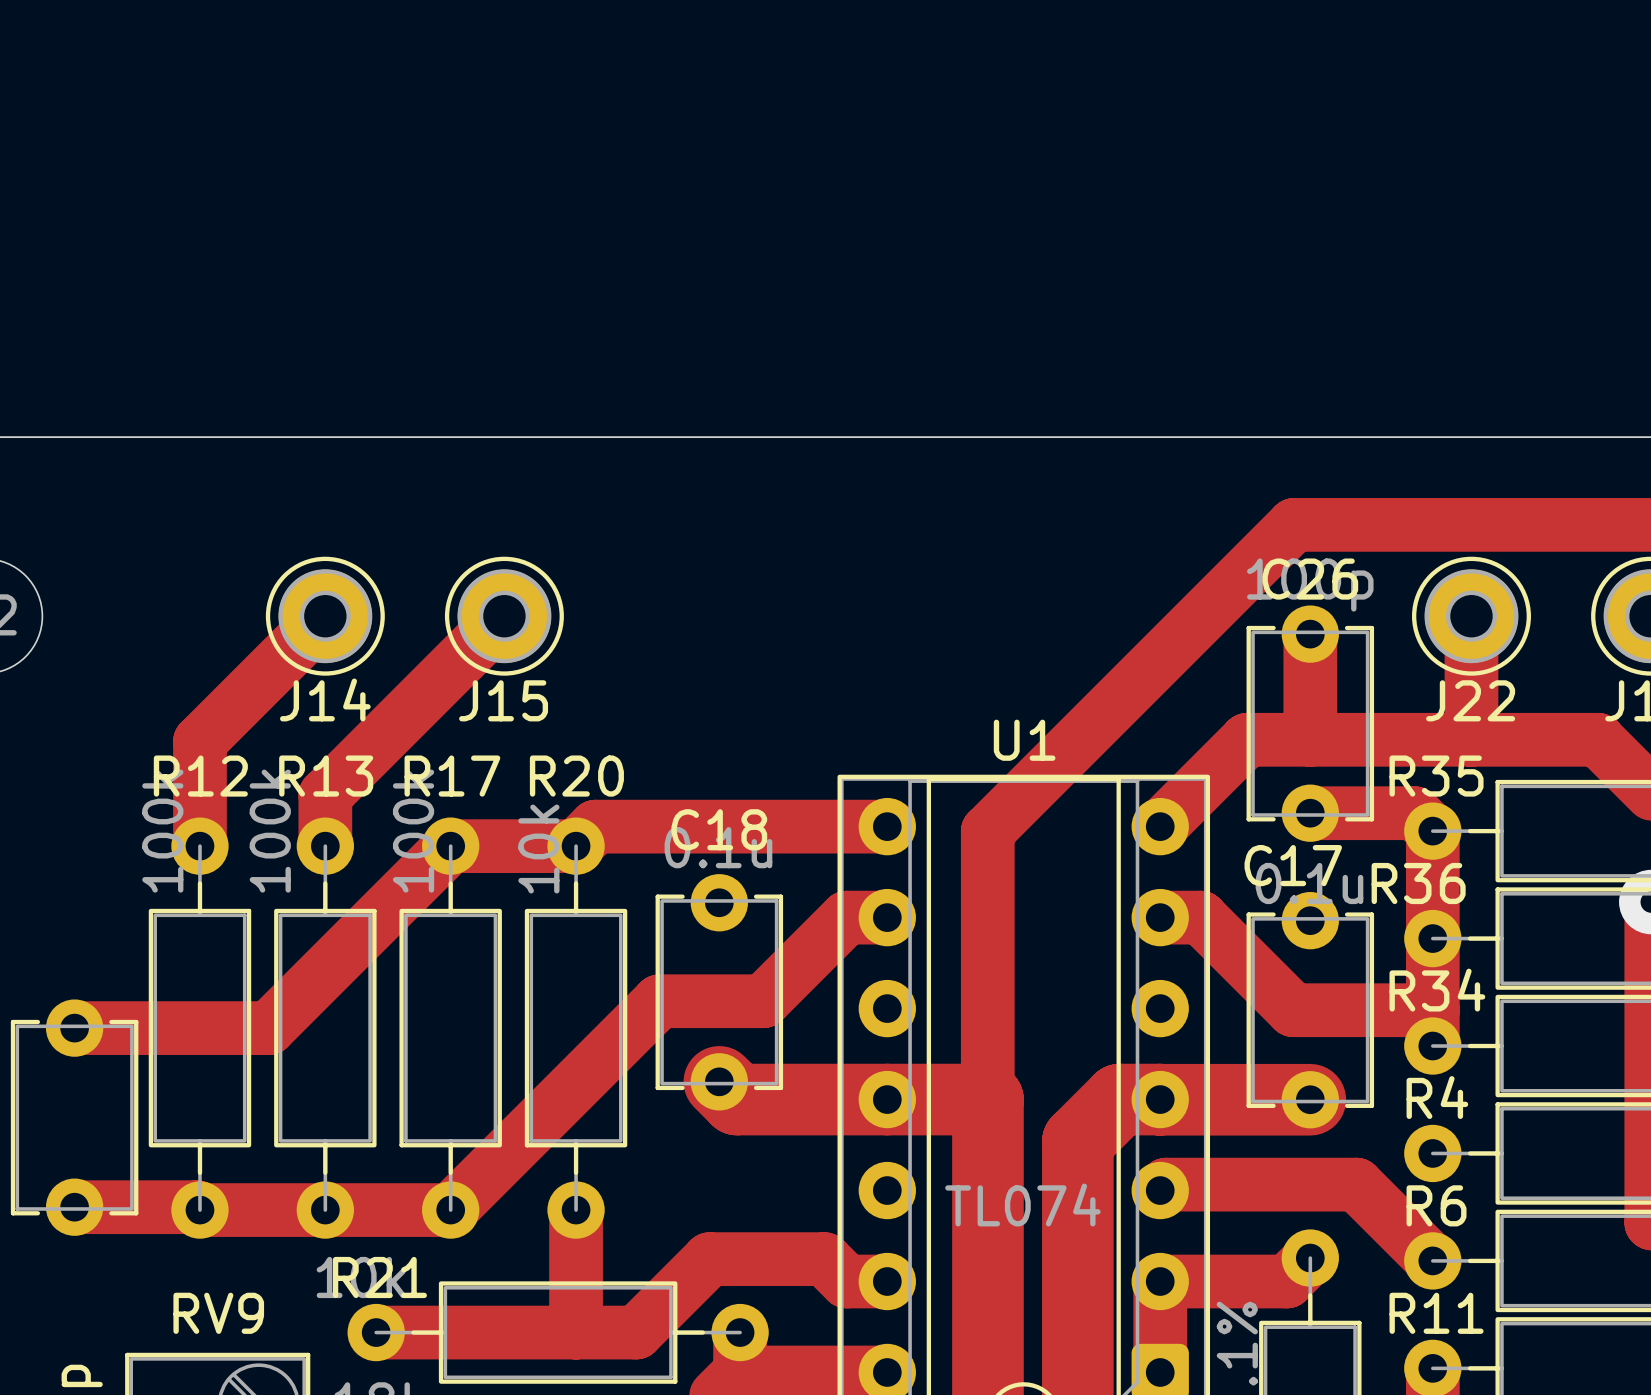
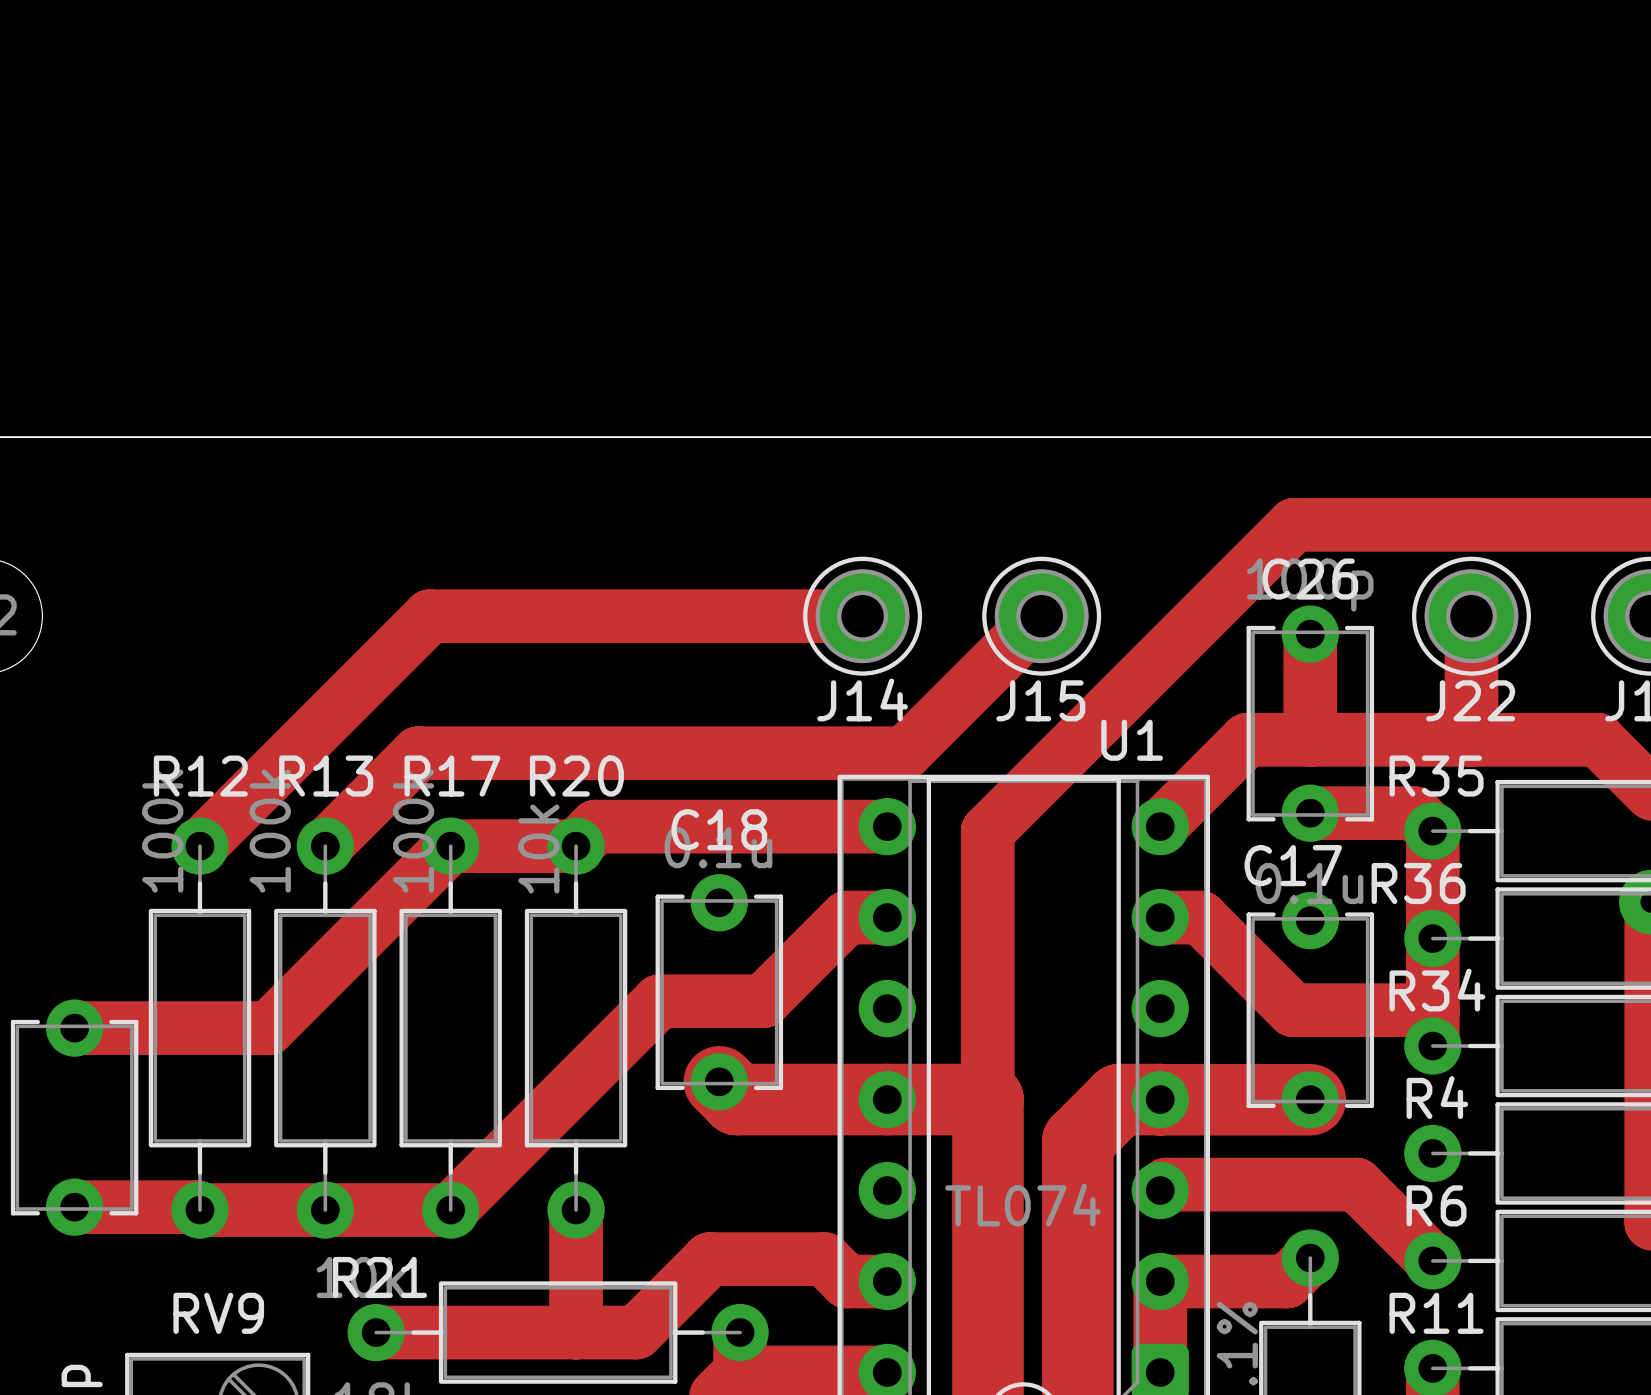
track: (325, 616) (199, 741) (199, 846) -> (862, 616) (429, 616) (199, 846)
J14 position: (325, 616) -> (862, 616)
track: (504, 616) (325, 795) (325, 846) -> (1041, 616) (904, 753) (418, 753) (325, 846)
J15 position: (504, 616) -> (1041, 616)
U1 name position: U1 (1024, 740) -> U1 (1132, 740)

